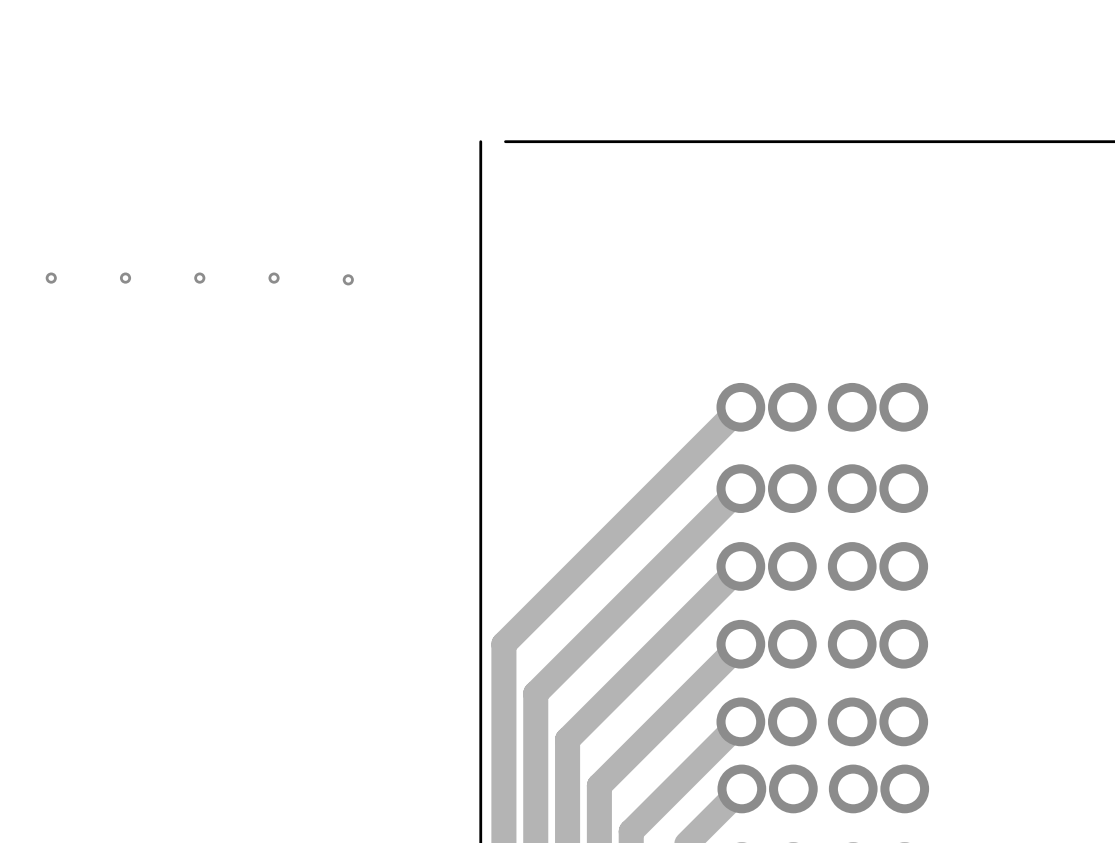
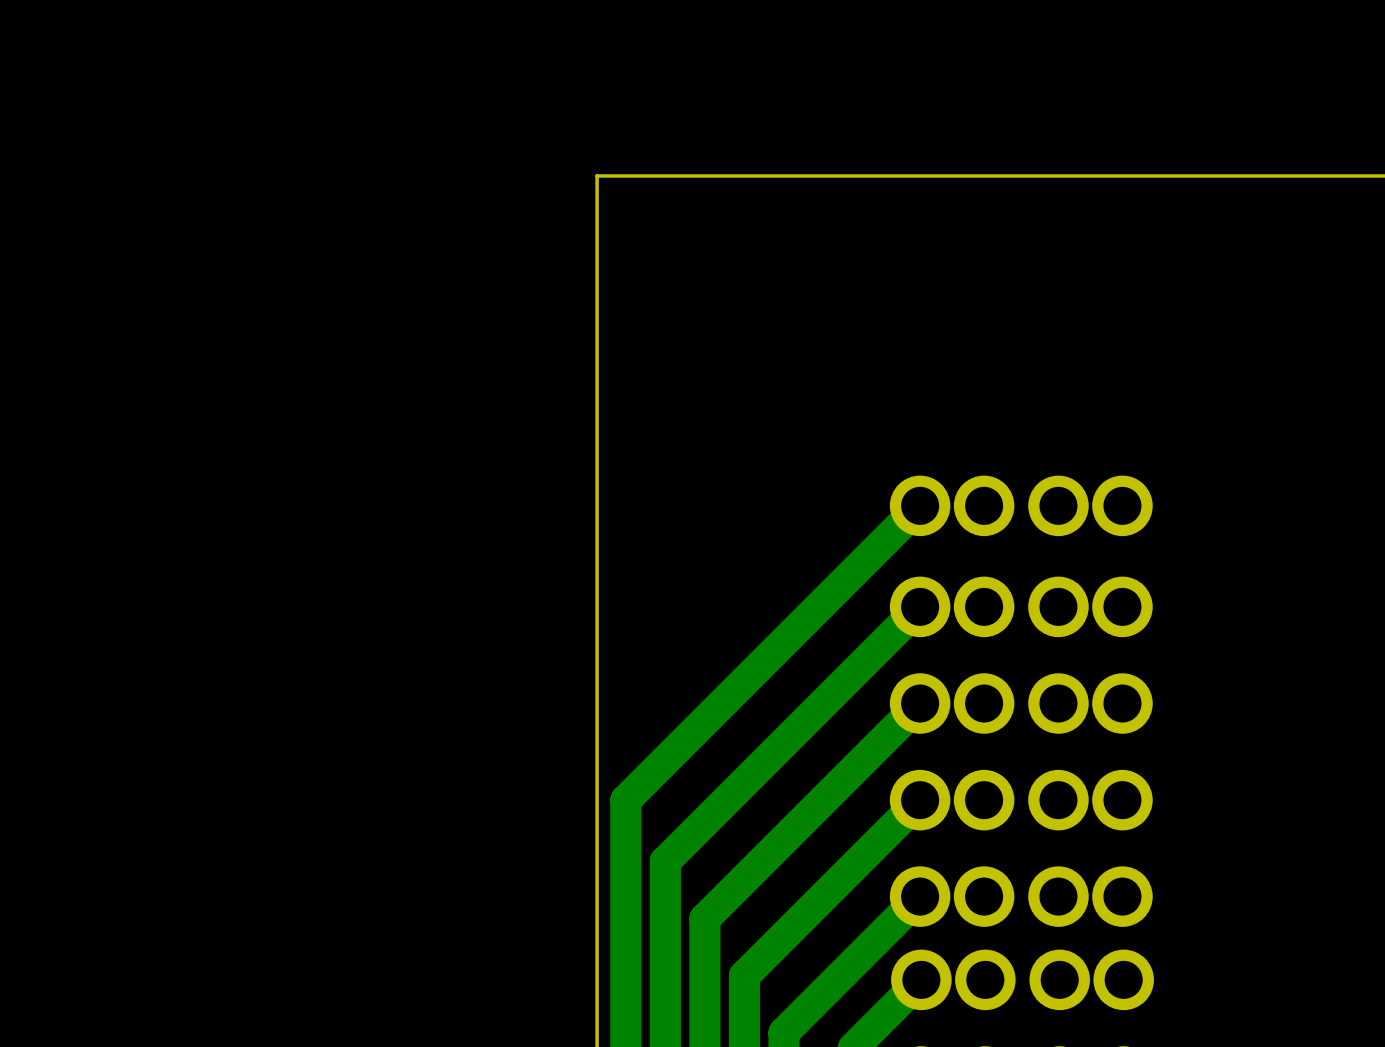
board edge: none -> (627, 175) (597, 175)
via: (51, 278) -> none
via: (125, 278) -> none
via: (199, 278) -> none
via: (274, 278) -> none
via: (348, 279) -> none

